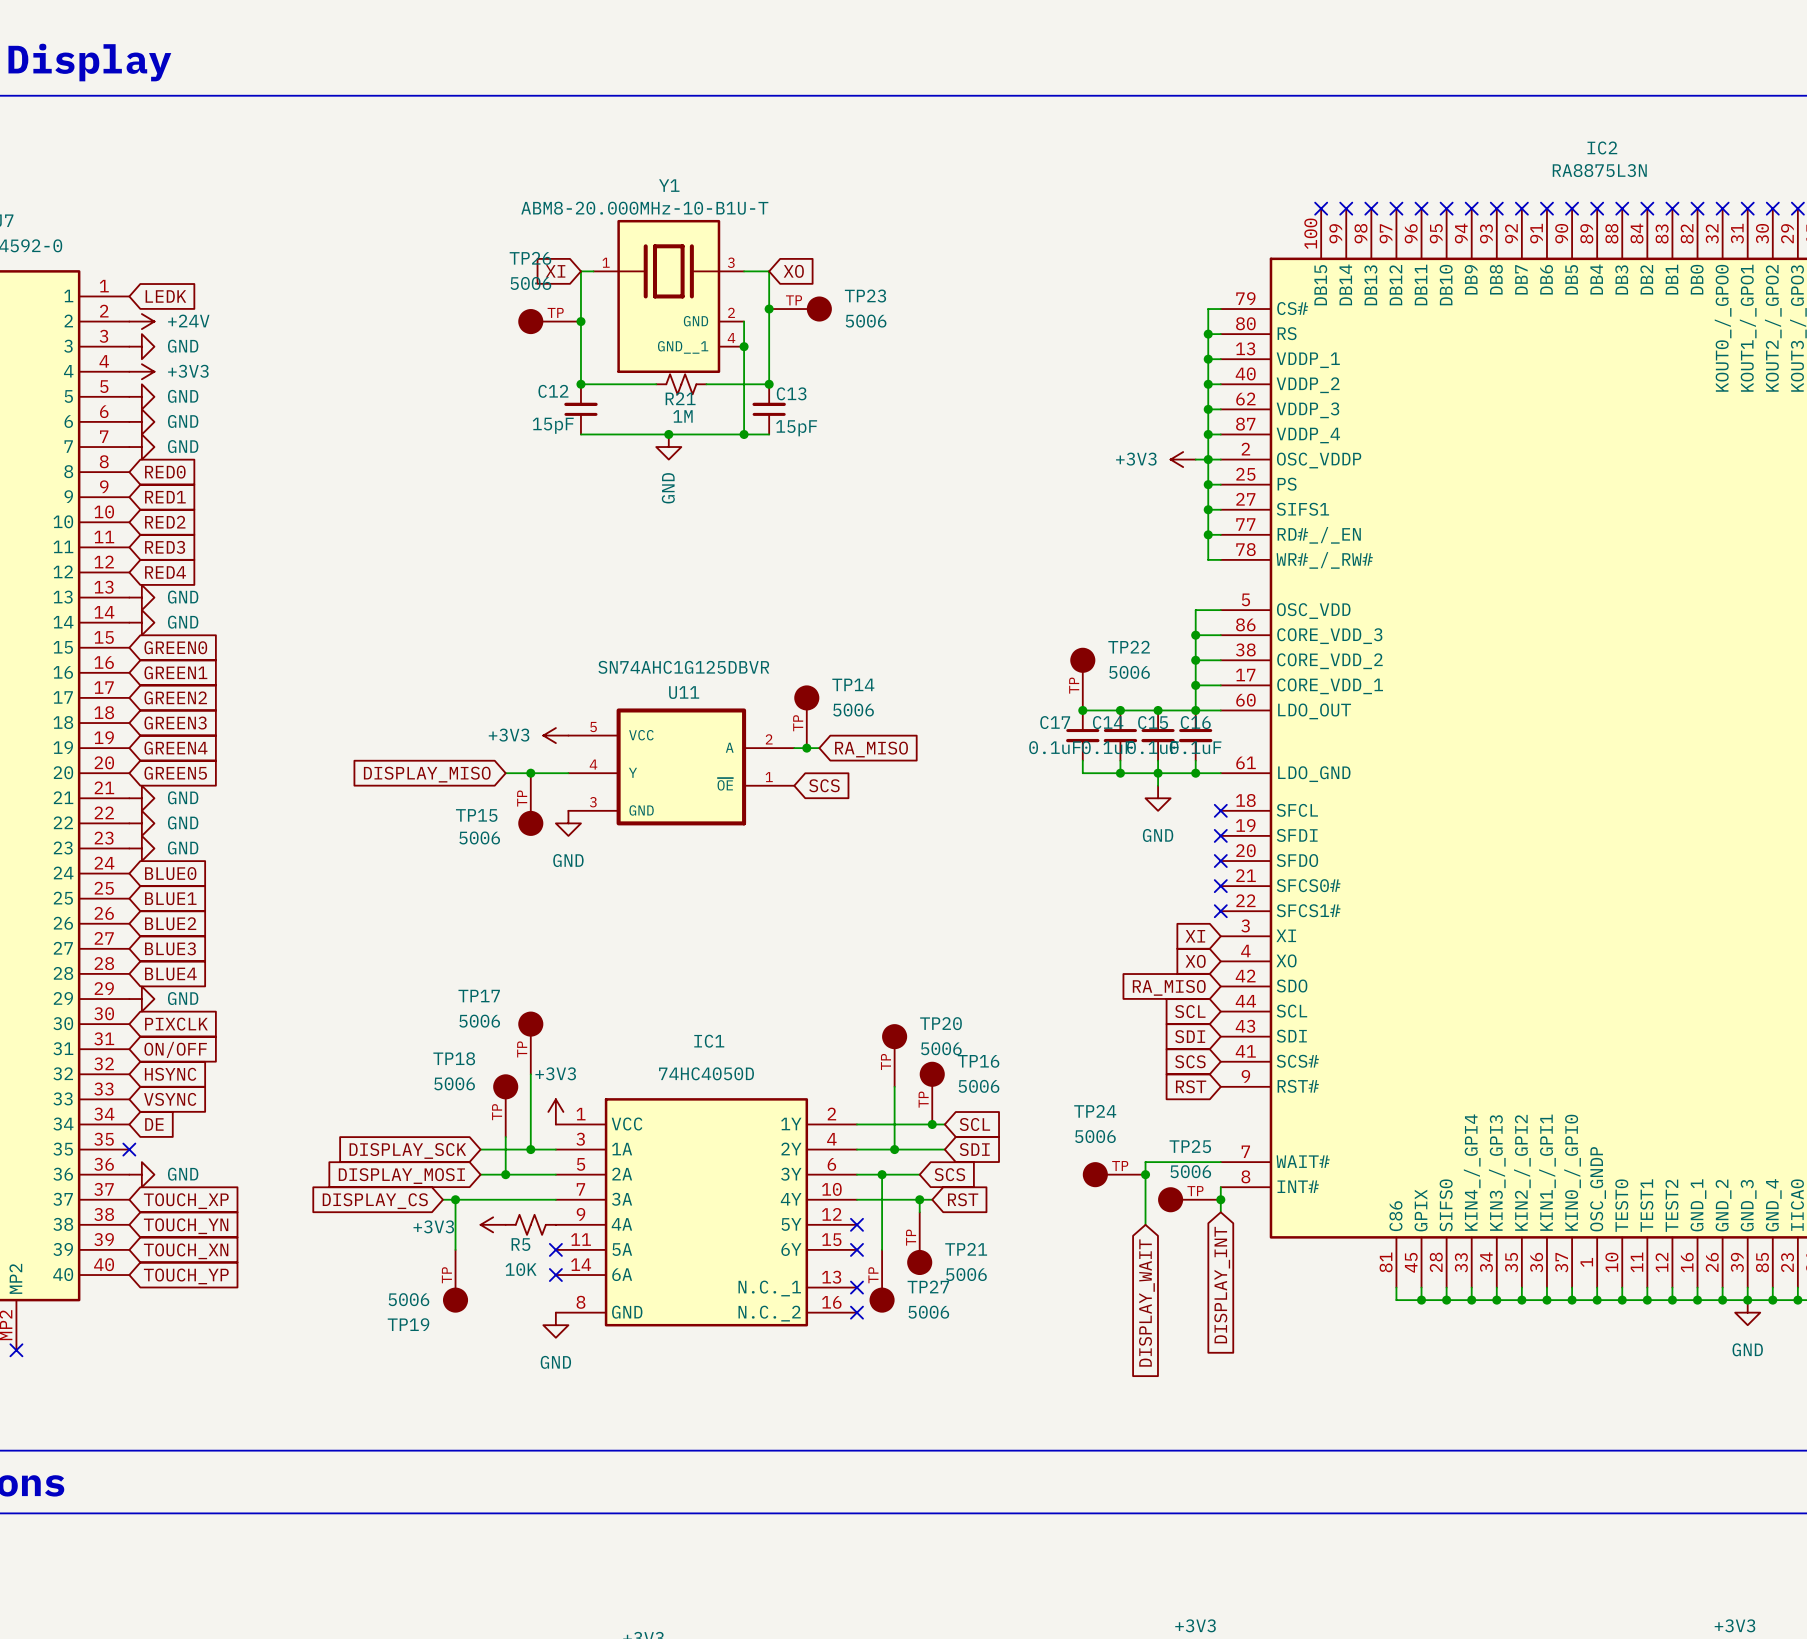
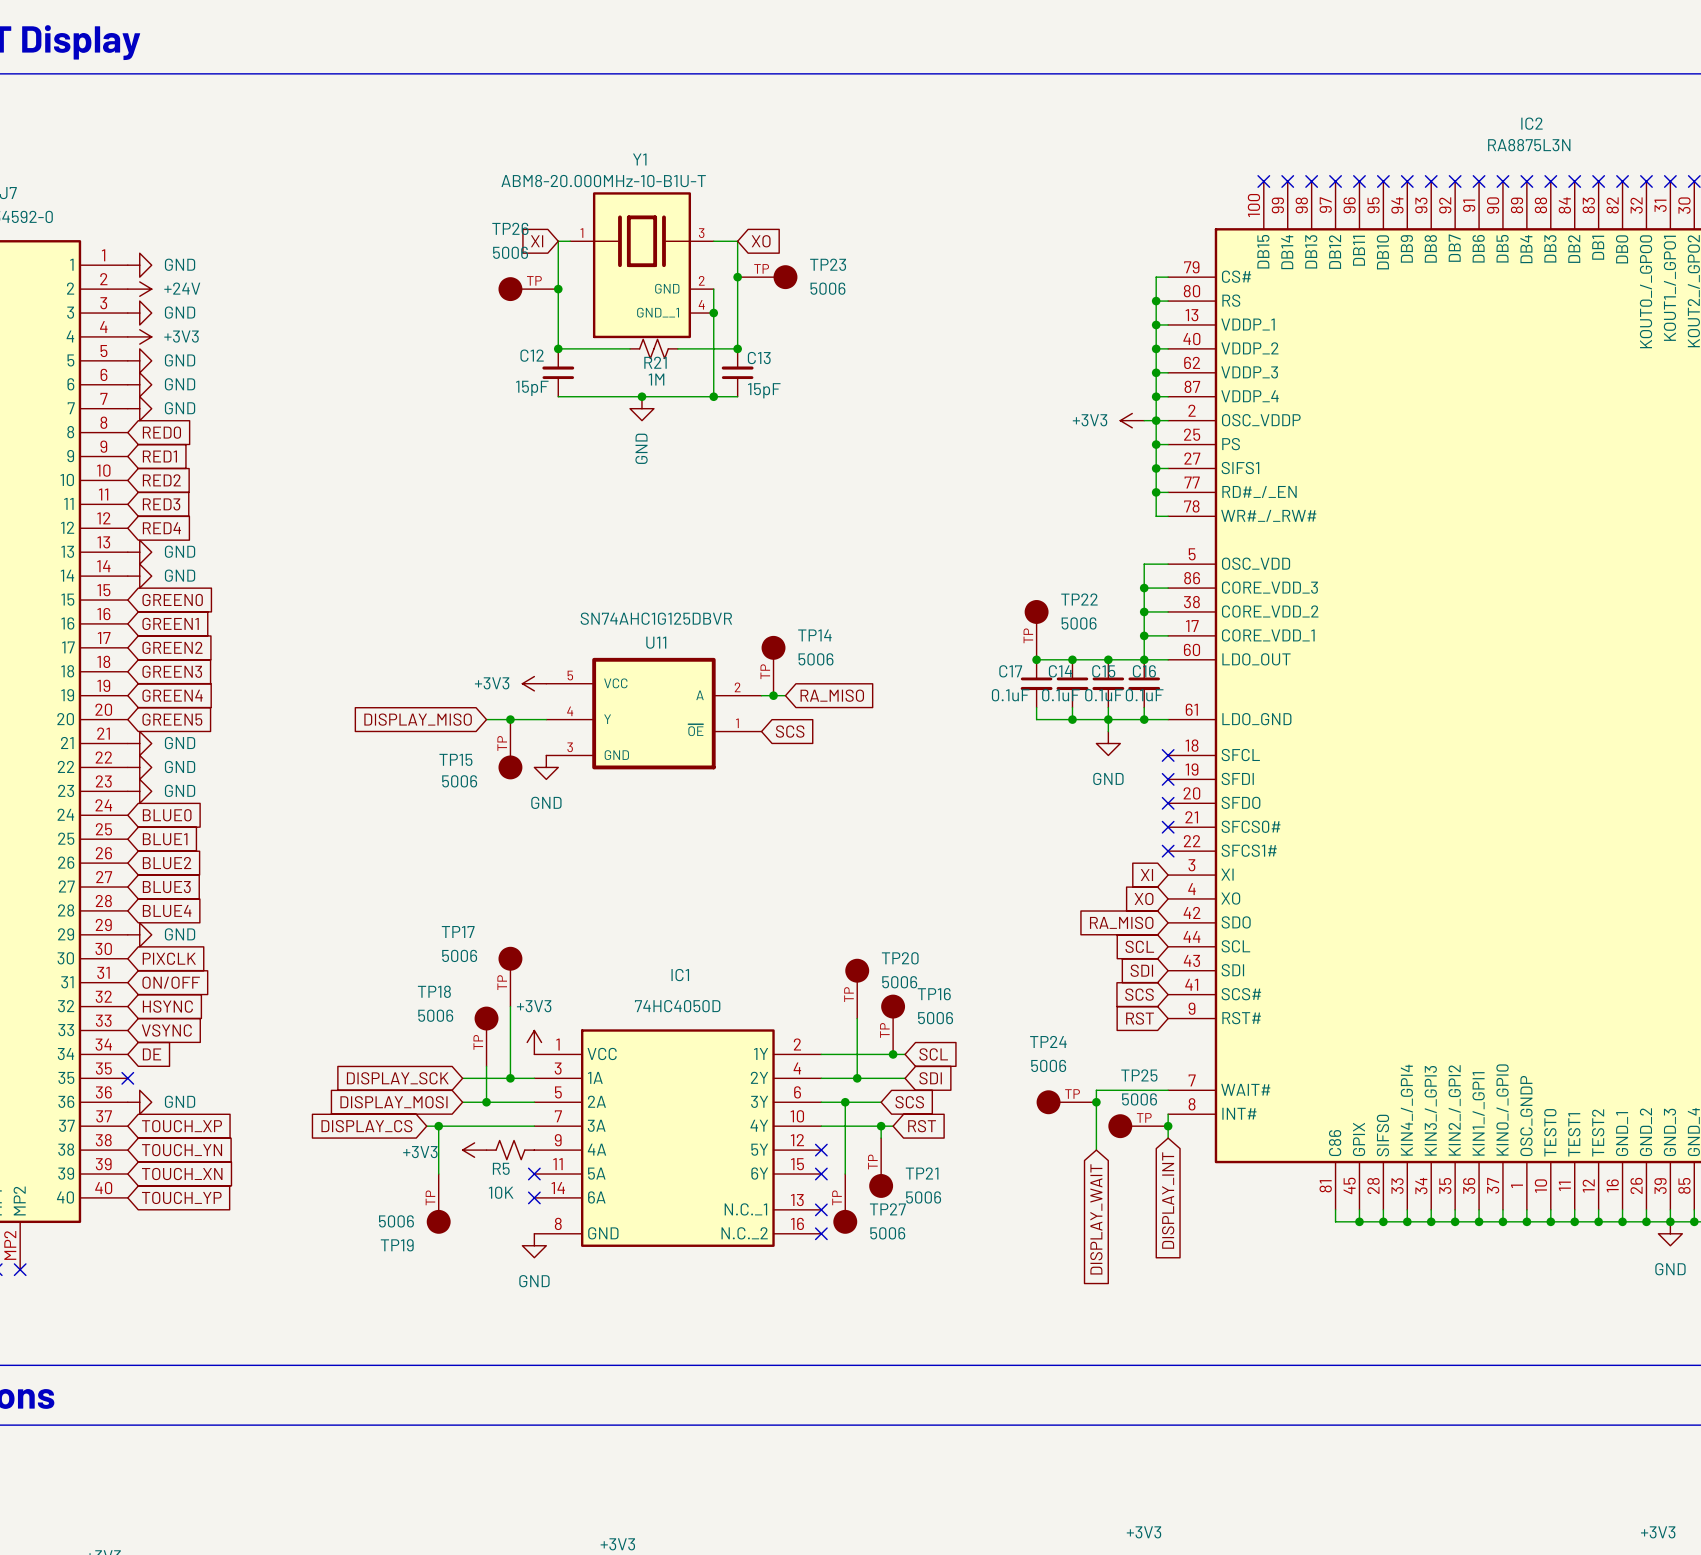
power symbol: none -> GND (139, 265)
global label: LEDK (165, 296) -> none

